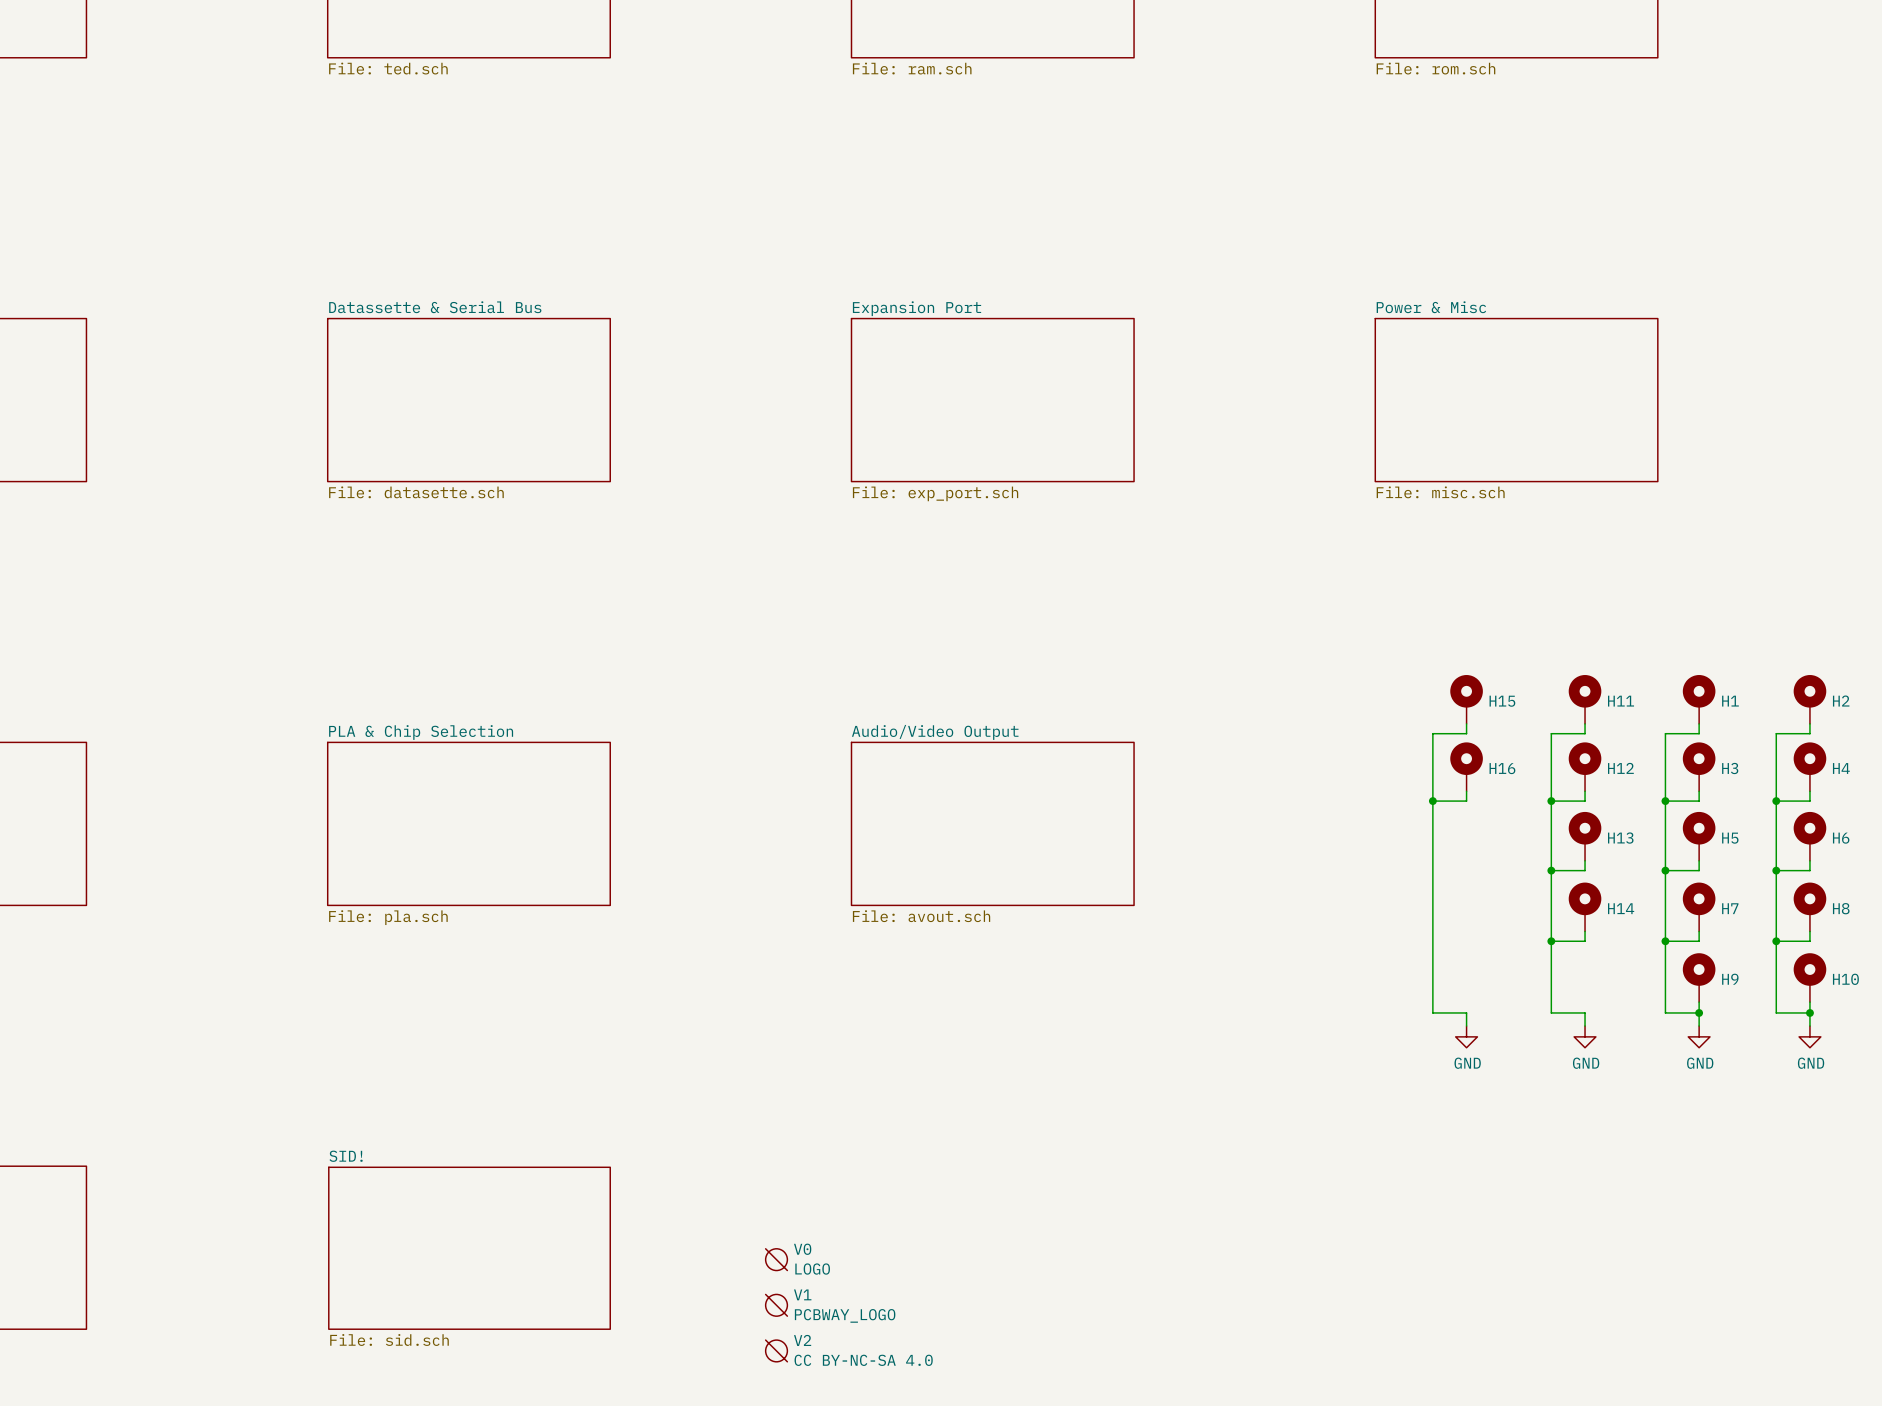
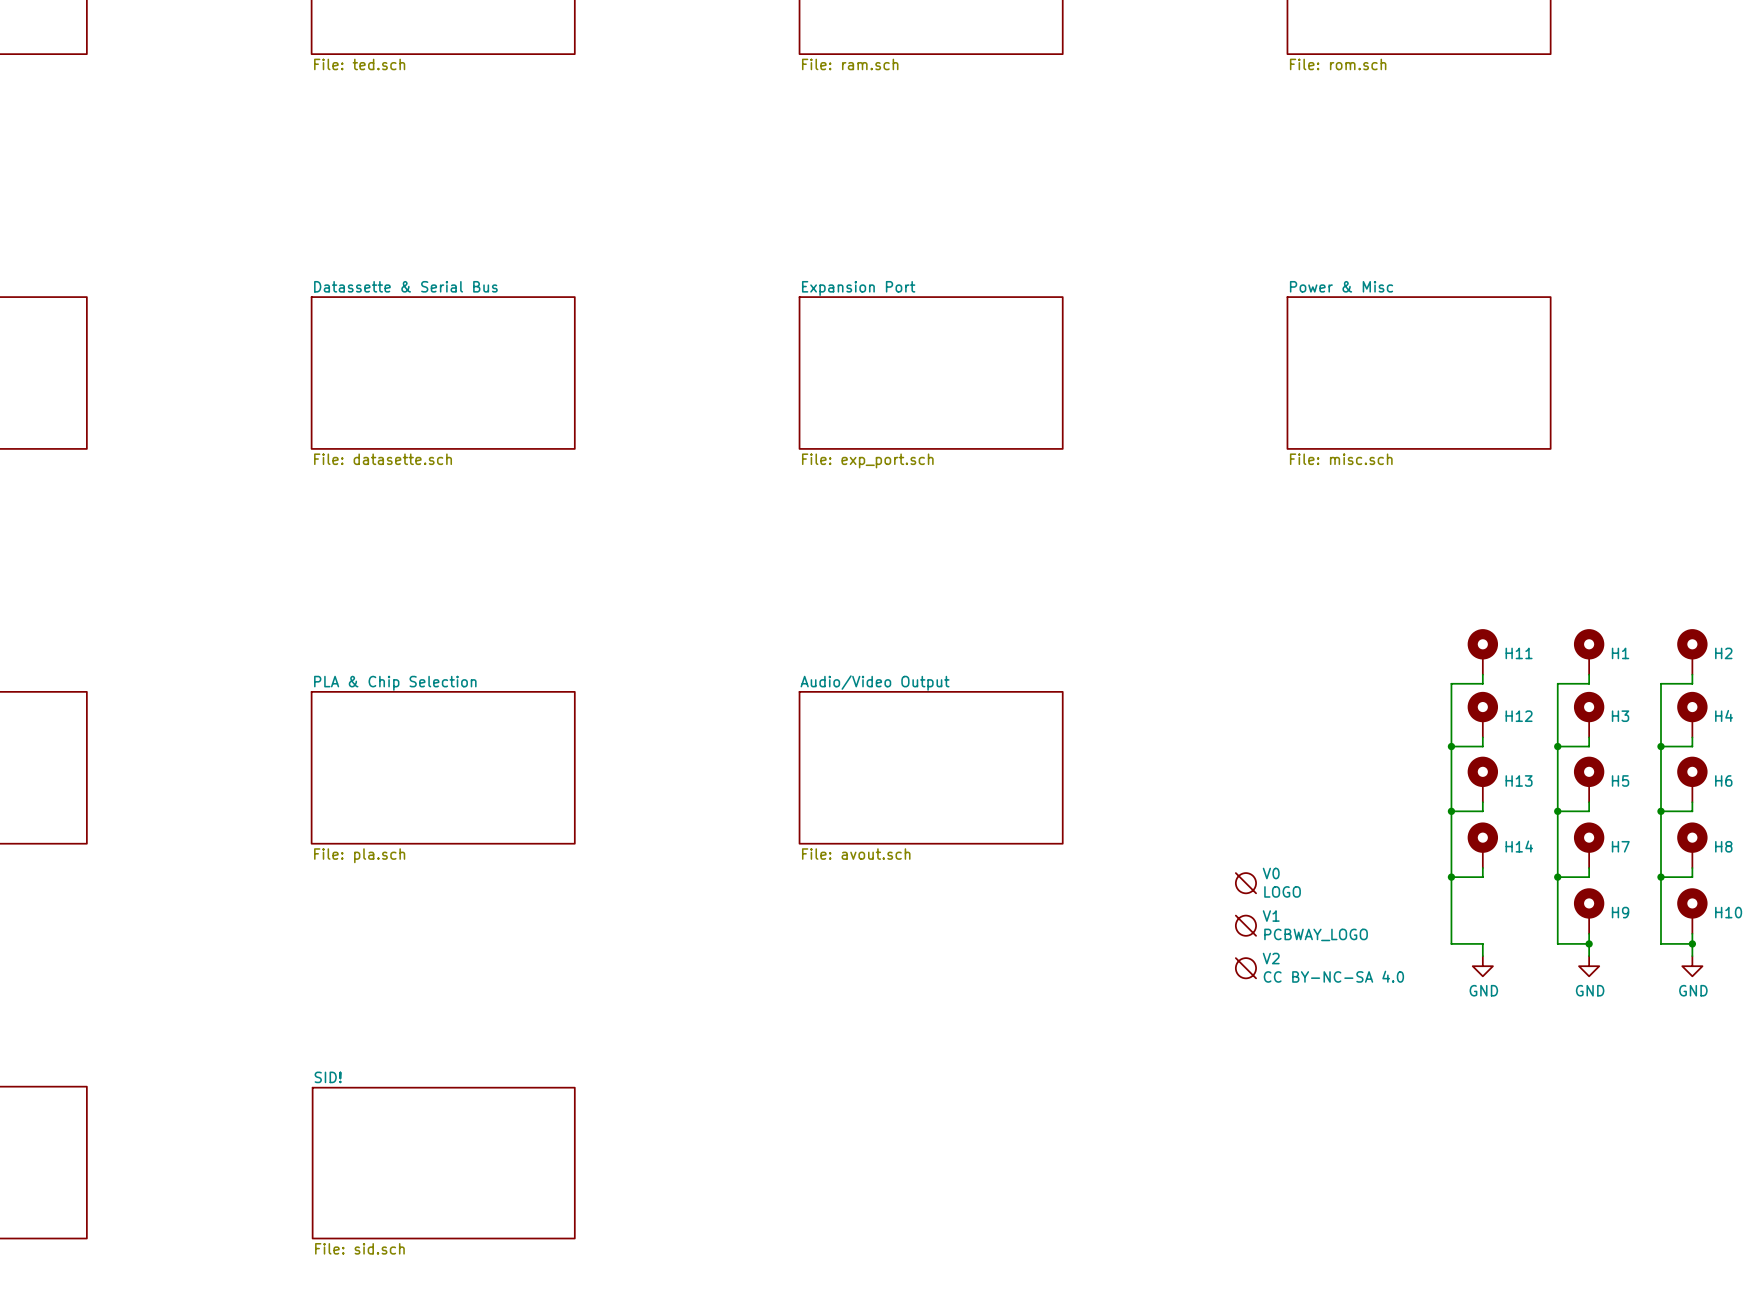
H15: (1466, 699) -> none
wire: (1466, 723) (1466, 733) (1432, 733) (1432, 1012) (1466, 1012) (1466, 1026) -> none
H16: (1466, 766) -> none
wire: (1466, 791) (1466, 801) (1432, 801) -> none
junction: (1432, 801) -> none
power symbol: GND (1466, 1036) -> none
V0 position: (776, 1259) -> (1245, 883)
V1 position: (776, 1305) -> (1245, 925)
V2 position: (776, 1350) -> (1245, 968)

